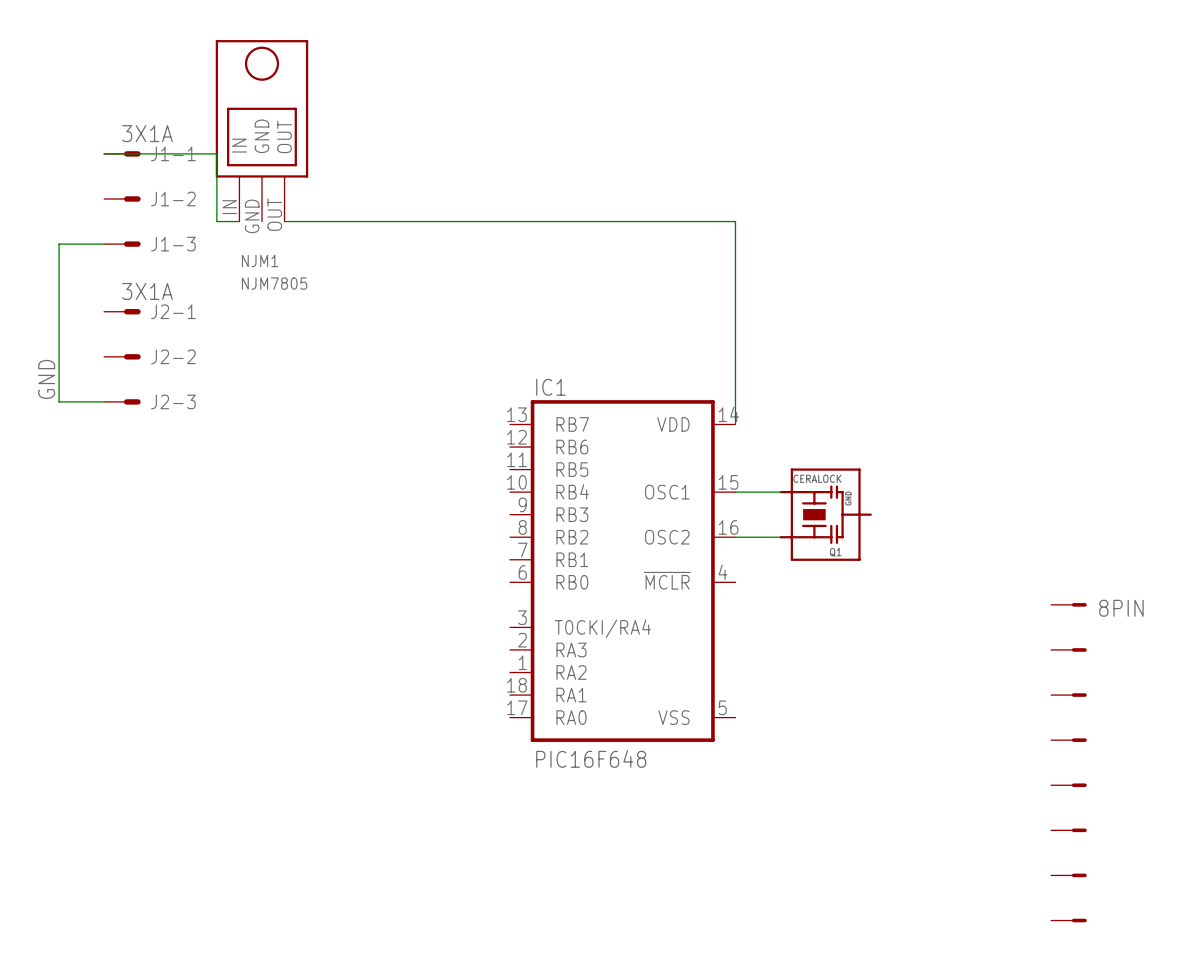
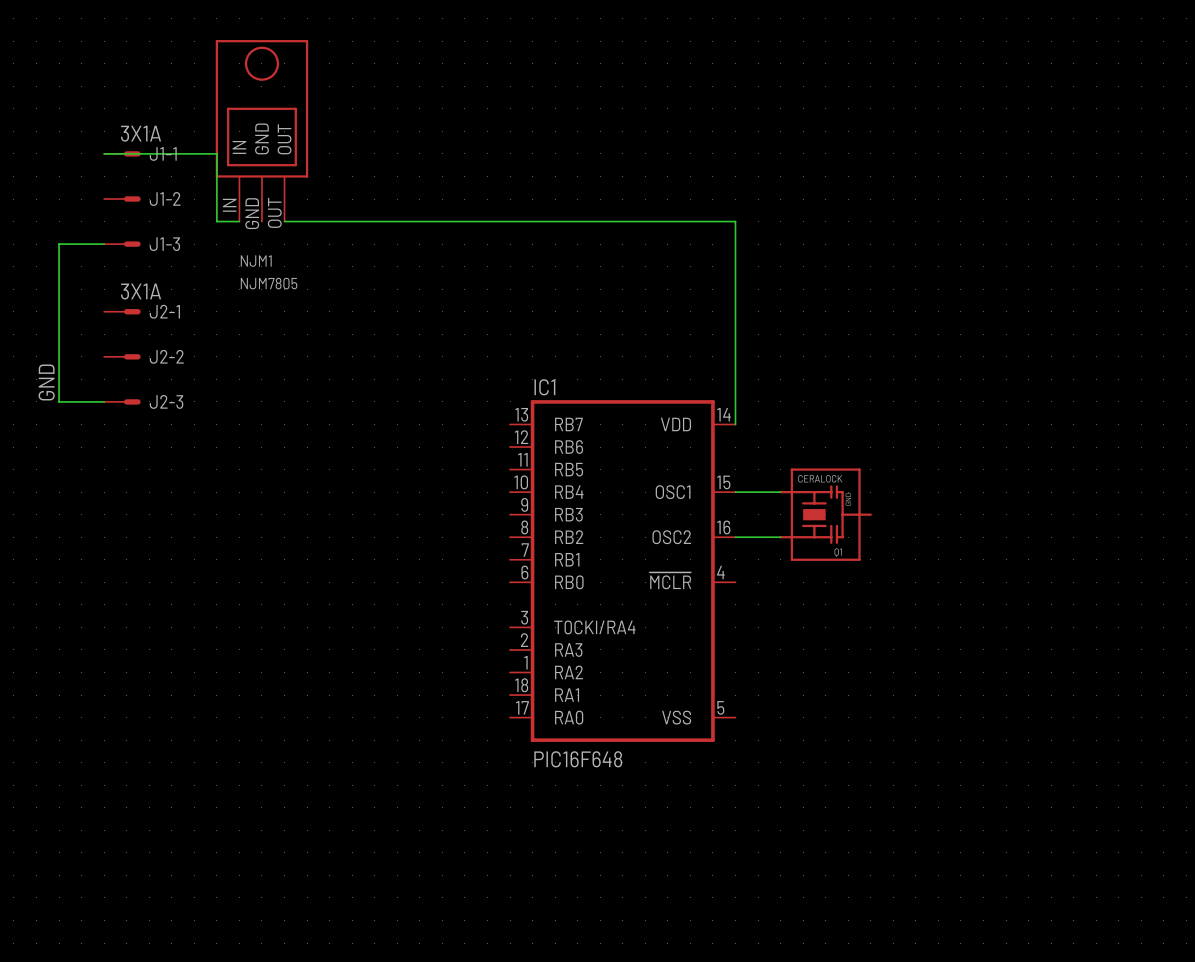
part: 8PIN (1068, 604) -> none
part: (1068, 649) -> none
part: (1068, 695) -> none
part: (1068, 740) -> none
part: (1068, 785) -> none
part: (1068, 830) -> none
part: (1068, 875) -> none
part: (1068, 920) -> none

